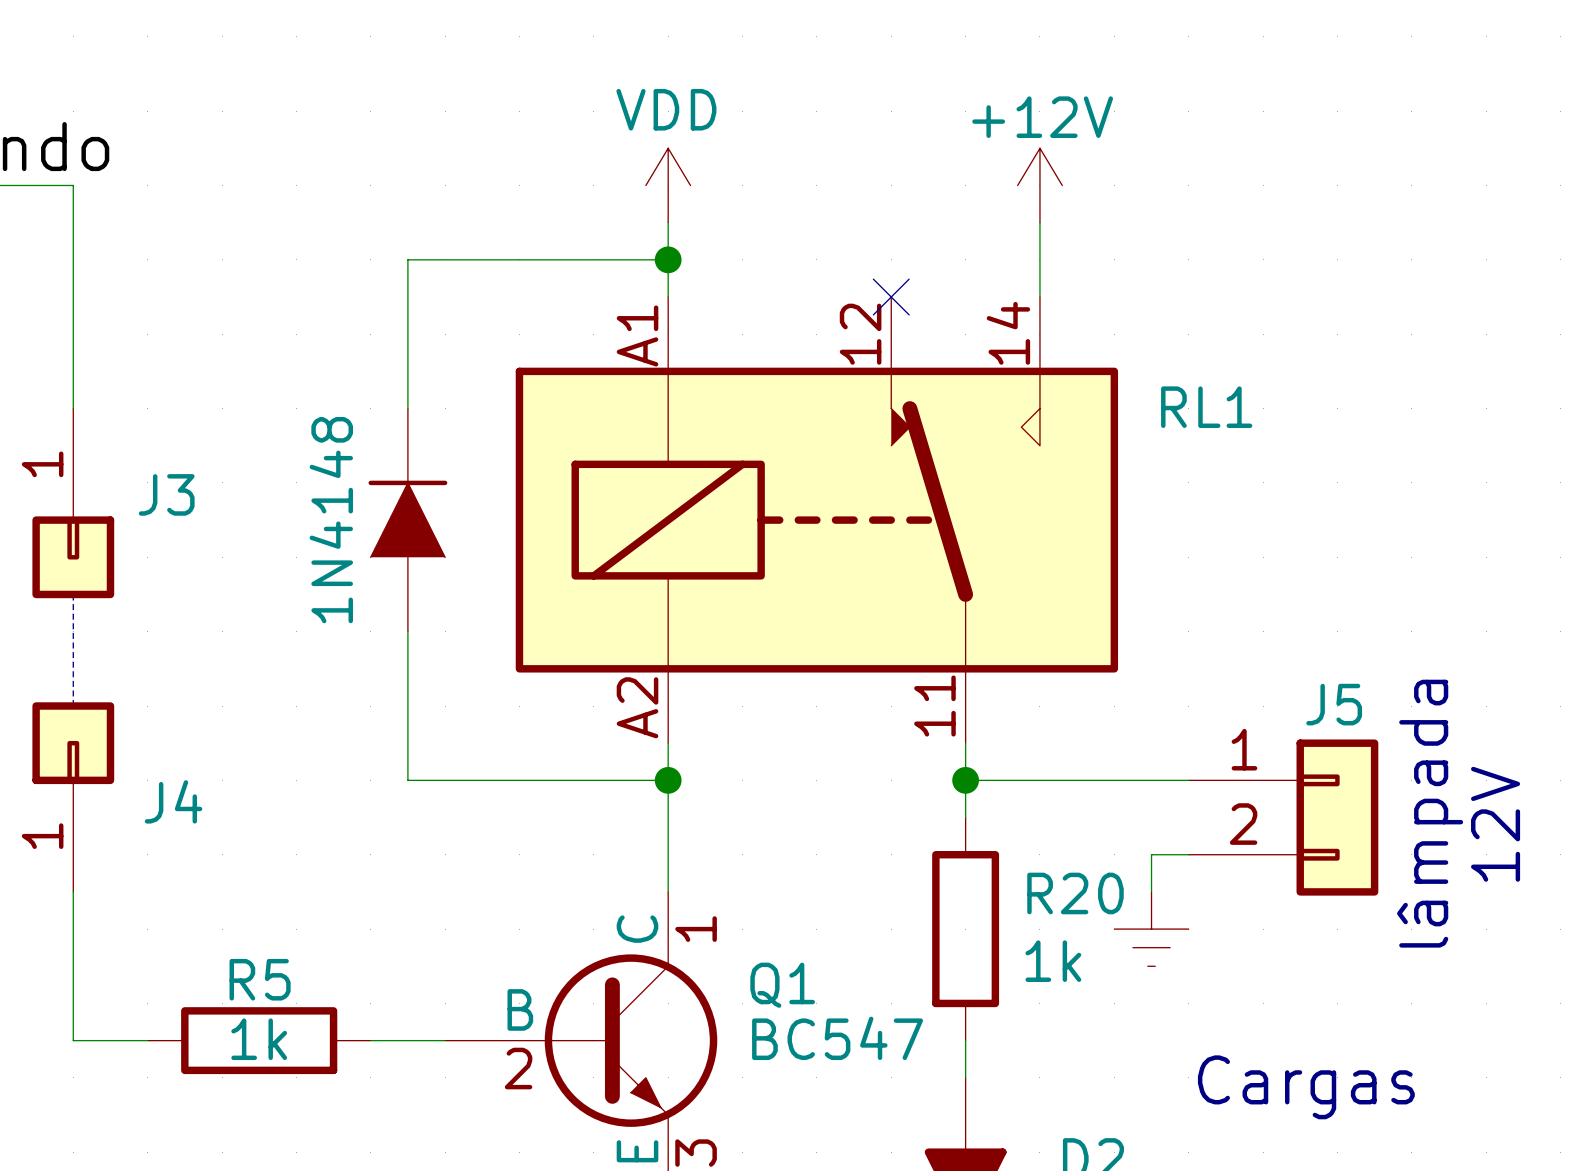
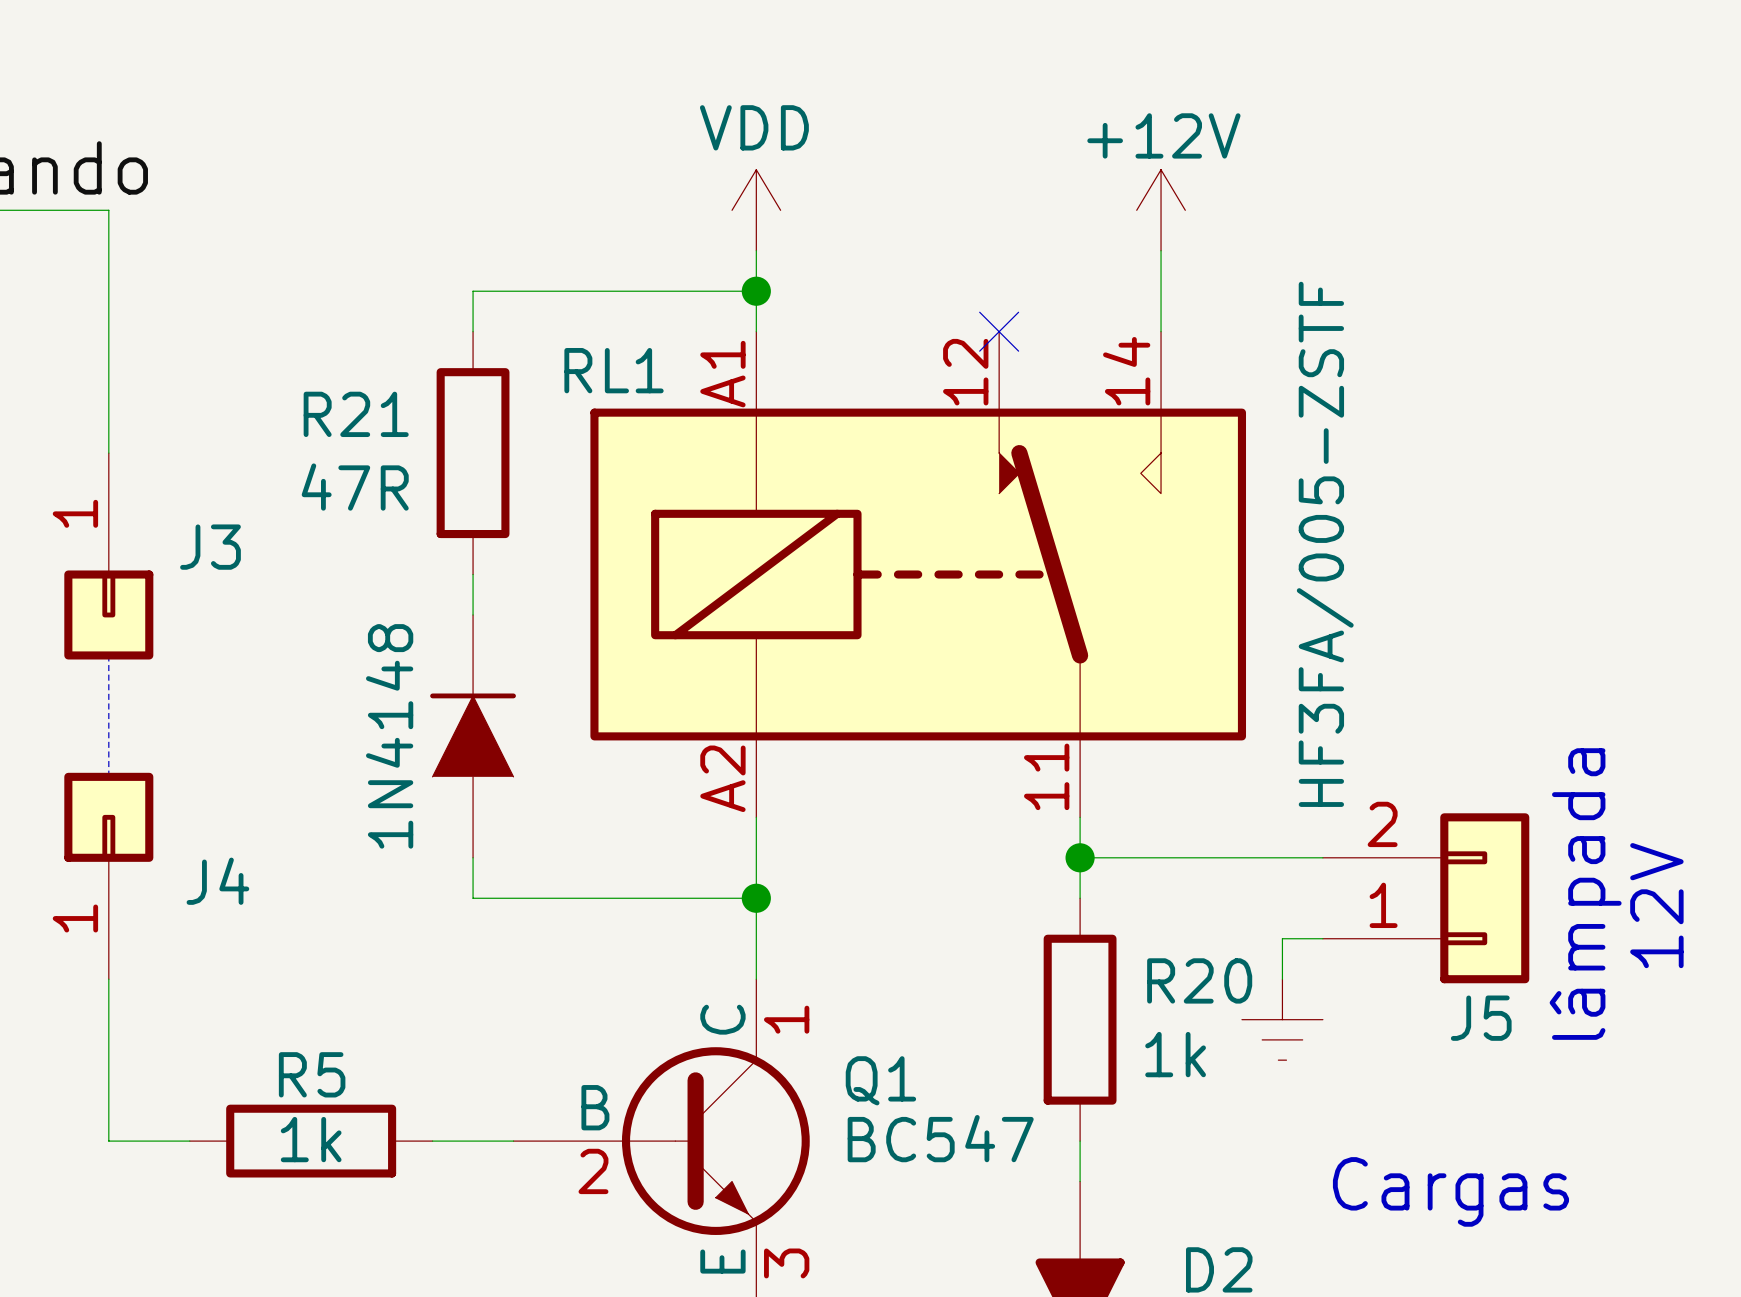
wire: (407, 297) (407, 408) -> none
RL1 name position: RL1 (1206, 407) -> RL1 (614, 370)
R21: none -> 47R (473, 453)
RL1 value: none -> HF3FA/005-ZSTF (1325, 544)
part position: (407, 520) -> (473, 736)
wire: (407, 631) (407, 780) (668, 780) -> none
wire: none -> (473, 857) (473, 898) (756, 898)
junction position: (668, 780) -> (756, 898)
J5 flip: as is (1337, 817) -> up-down (1484, 898)

